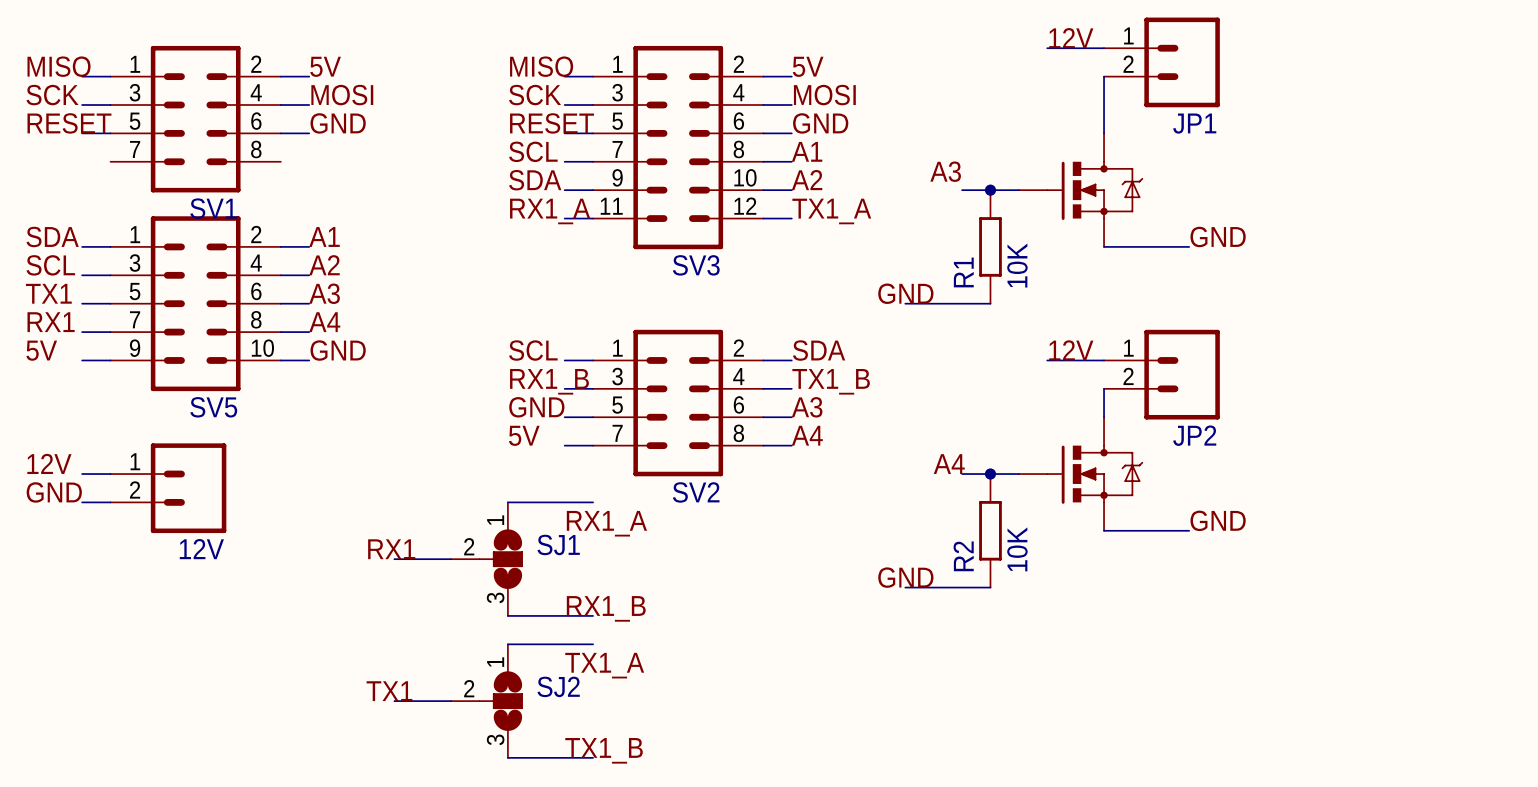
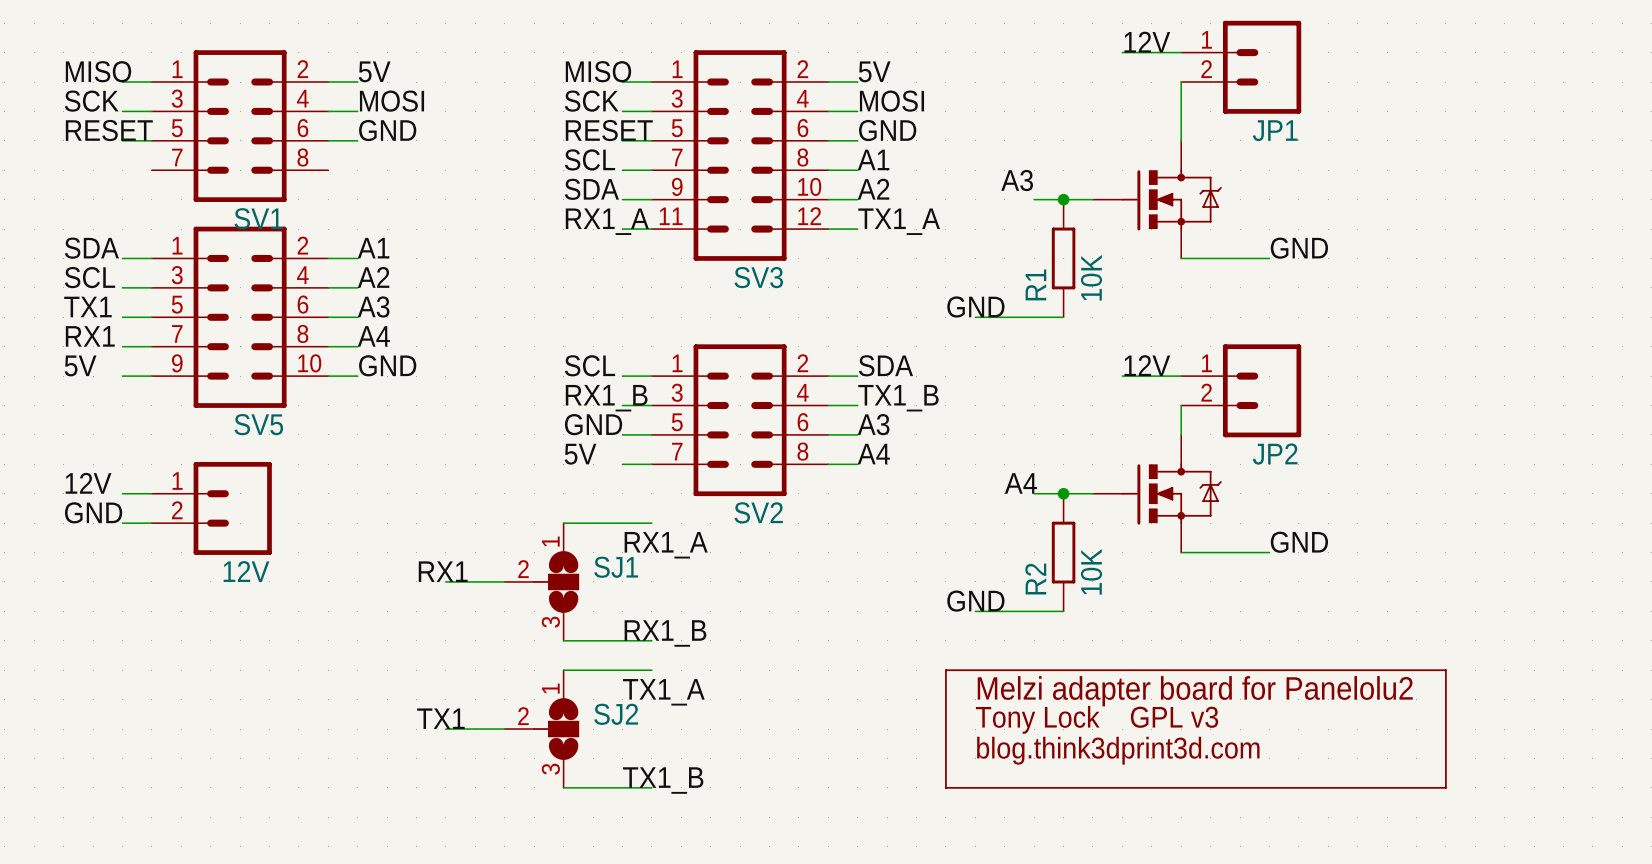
line: none -> (945, 670) (945, 787) (1445, 787) (1445, 670) (945, 670)
text: none -> Melzi adapter board for Panelolu2 (1195, 691)
text: none -> Tony Lock GPL v3 (1097, 719)
text: none -> blog.think3dprint3d.com (1118, 750)

